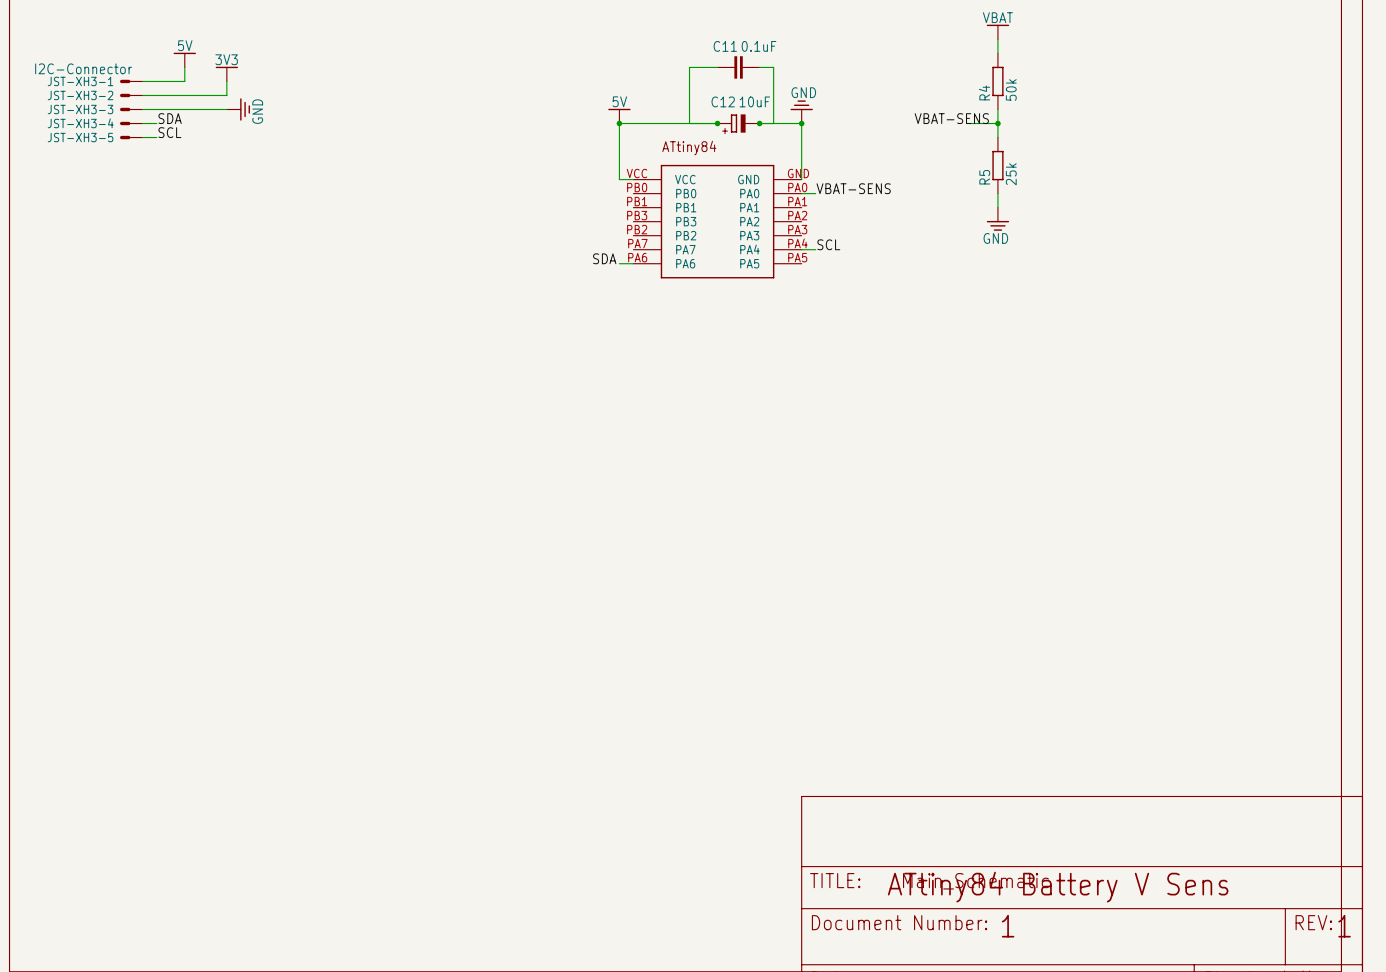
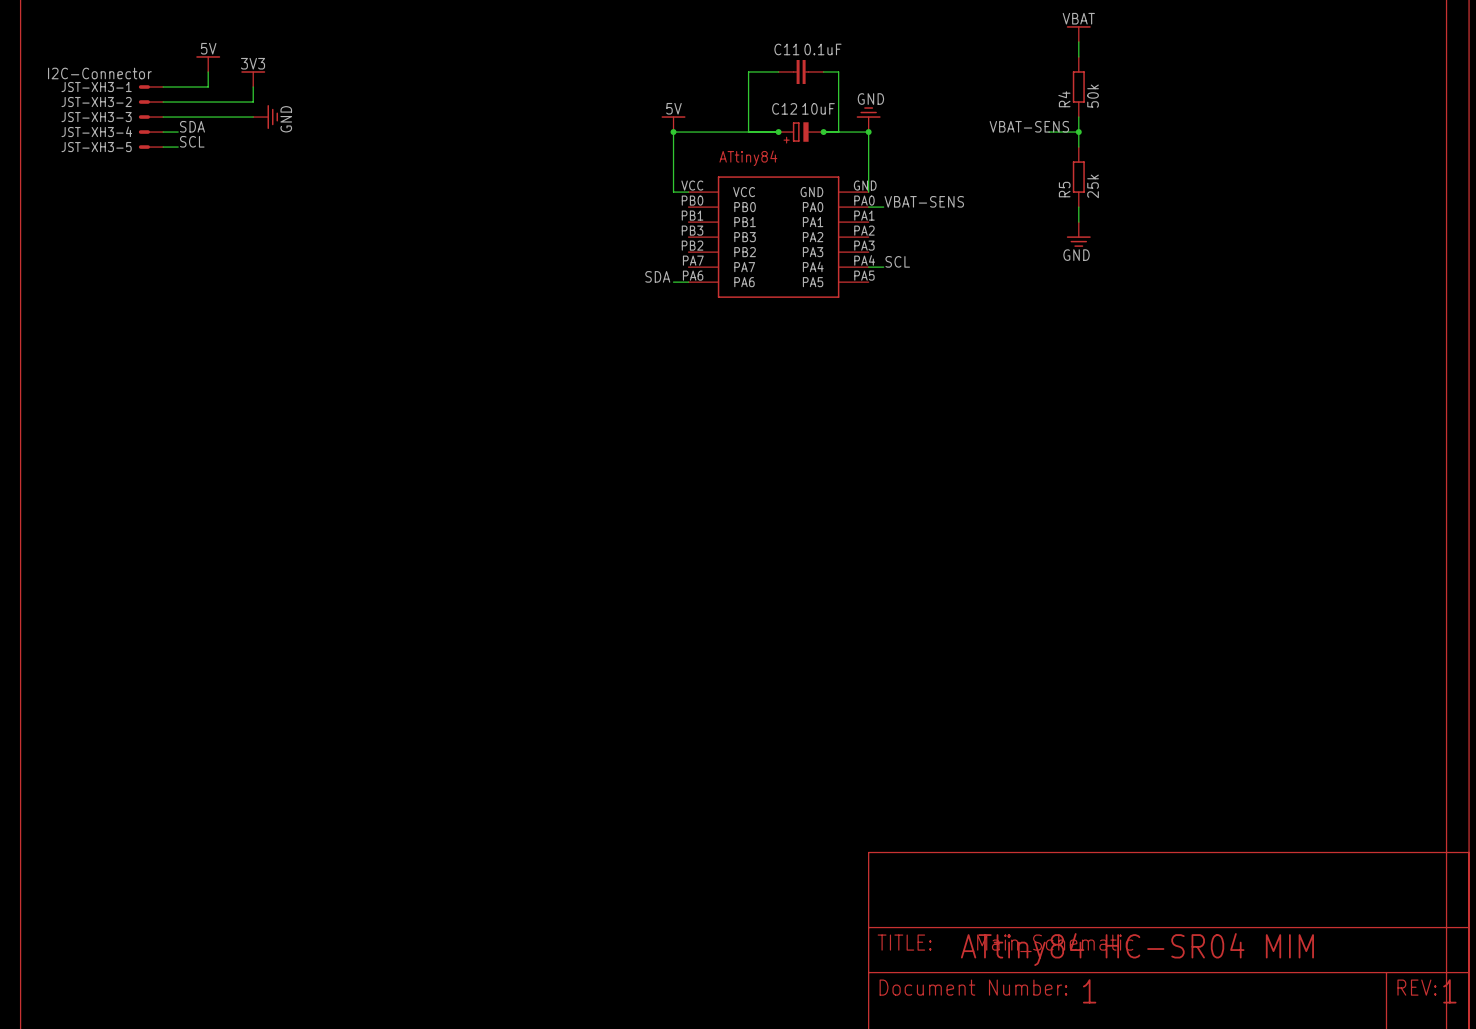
text: ATtiny84 Battery V Sens (1058, 887) -> ATtiny84 HC-SR04 MIM (1137, 949)

